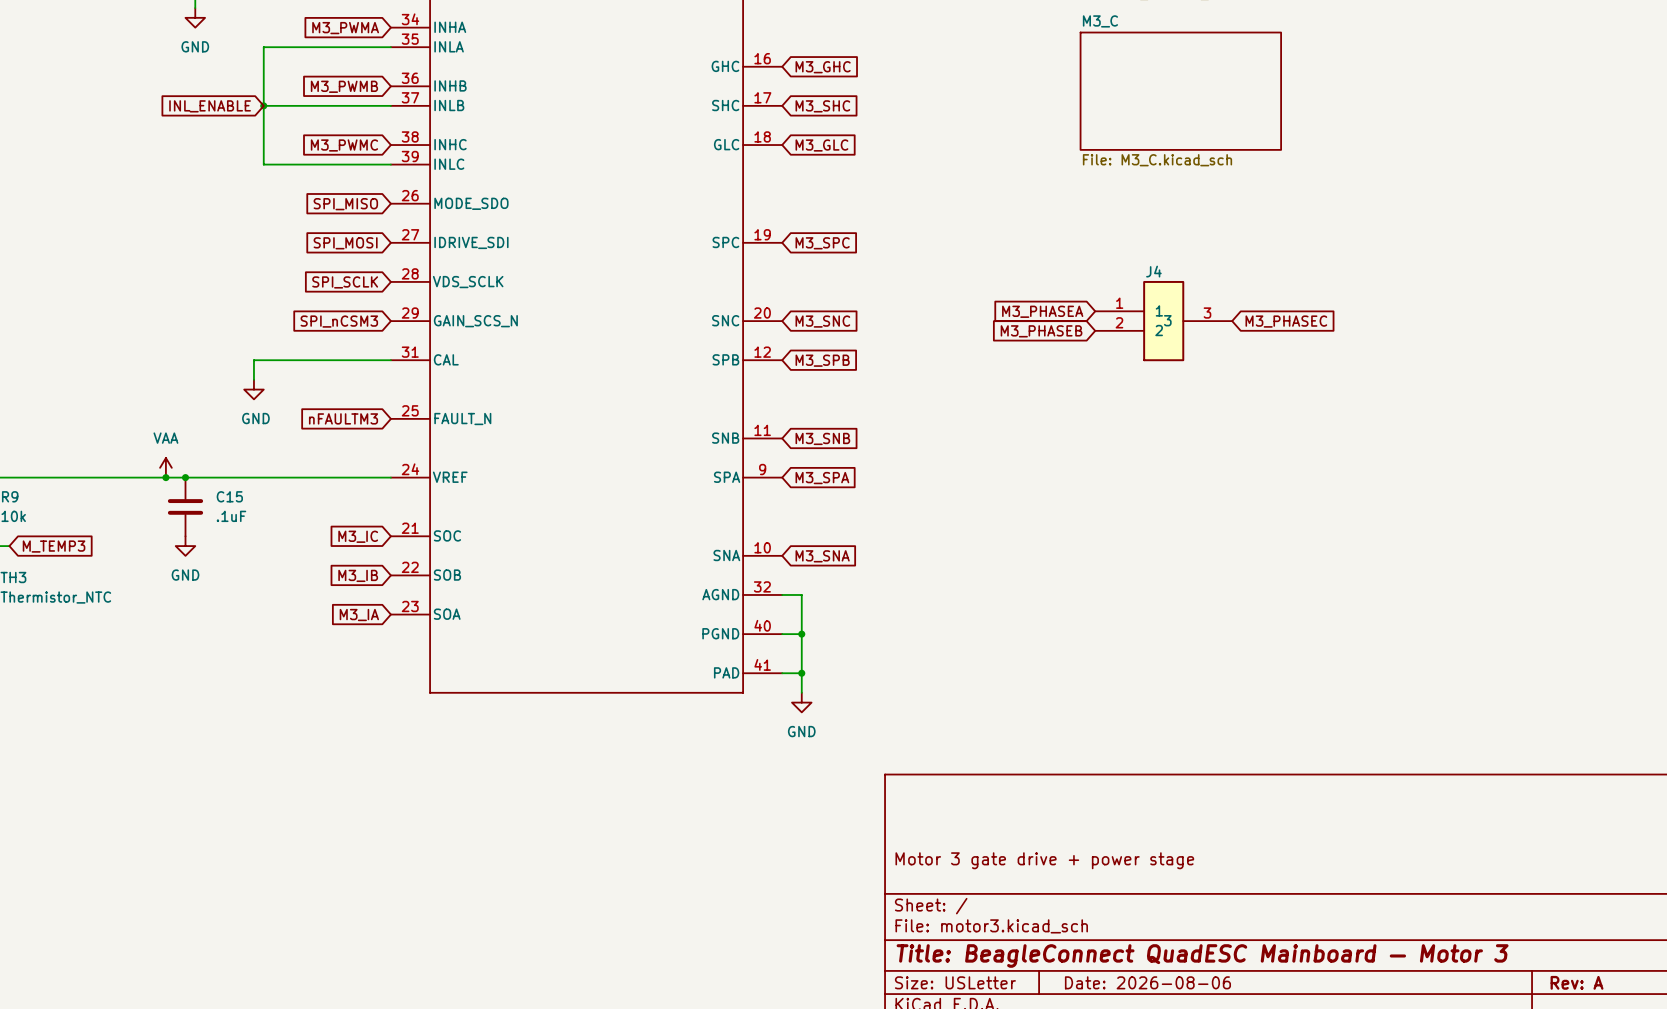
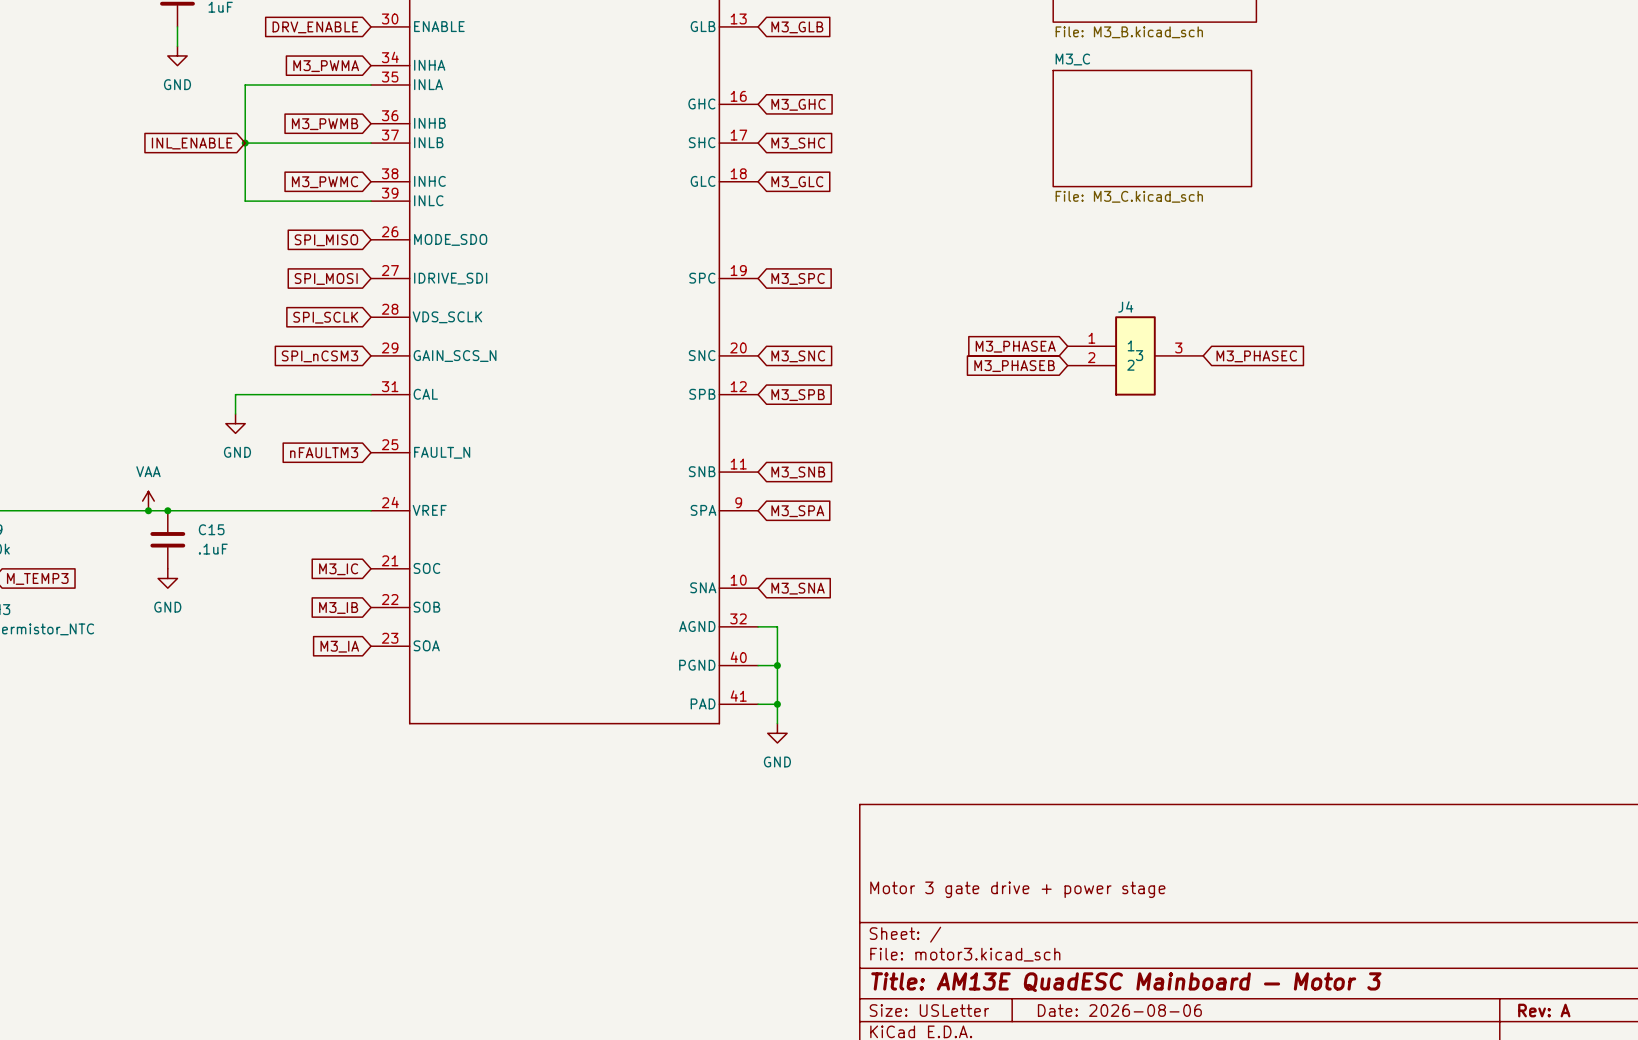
title block: Title: BeagleConnect QuadESC Mainboard — Motor 3 (1202, 955) -> Title: AM13E QuadESC Mainboard — Motor 3 (1126, 982)

